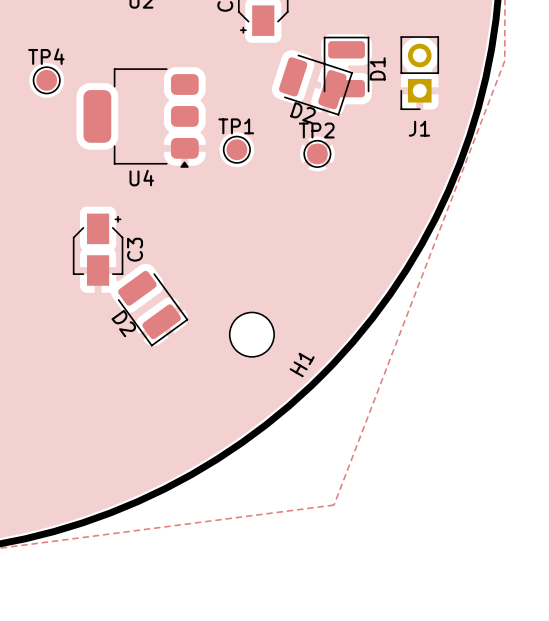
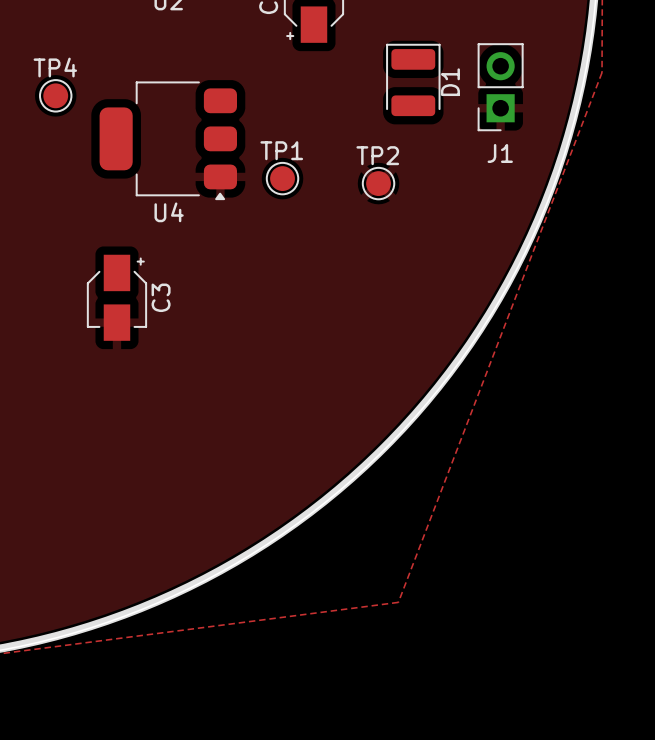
D2: (315, 85) -> none
D2: (153, 308) -> none
H1: (251, 334) -> none

